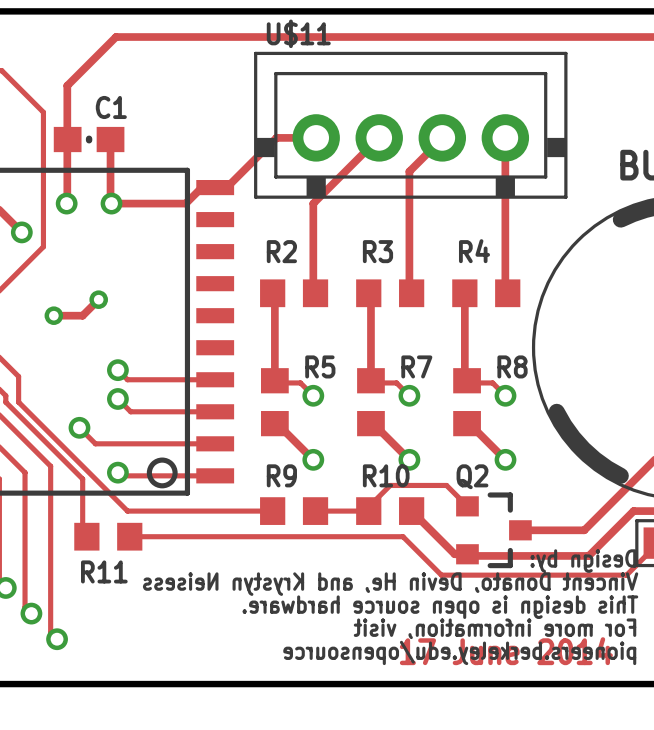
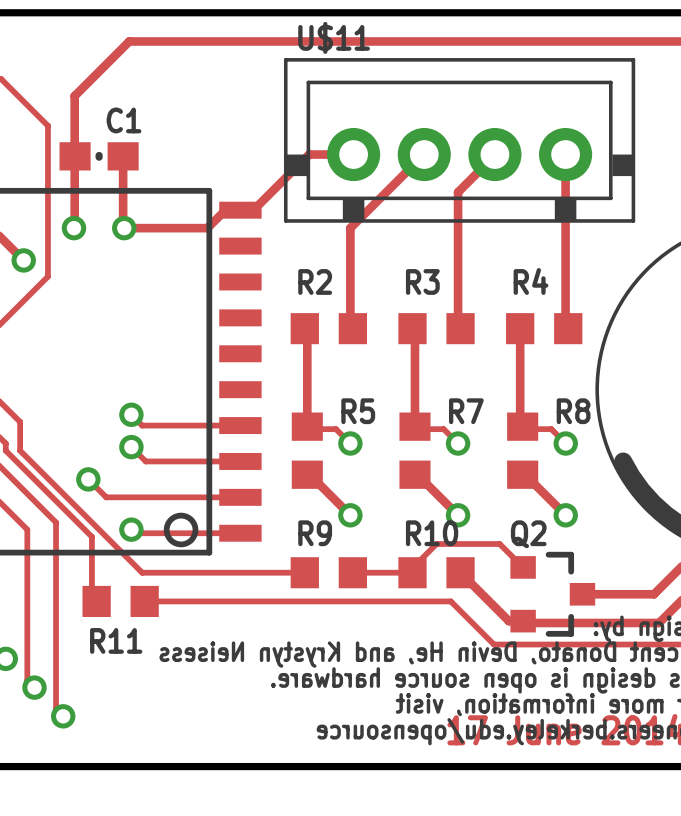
track: (98, 299) (82, 315) (53, 315) -> none
via: (98, 299) -> none
via: (53, 315) -> none

